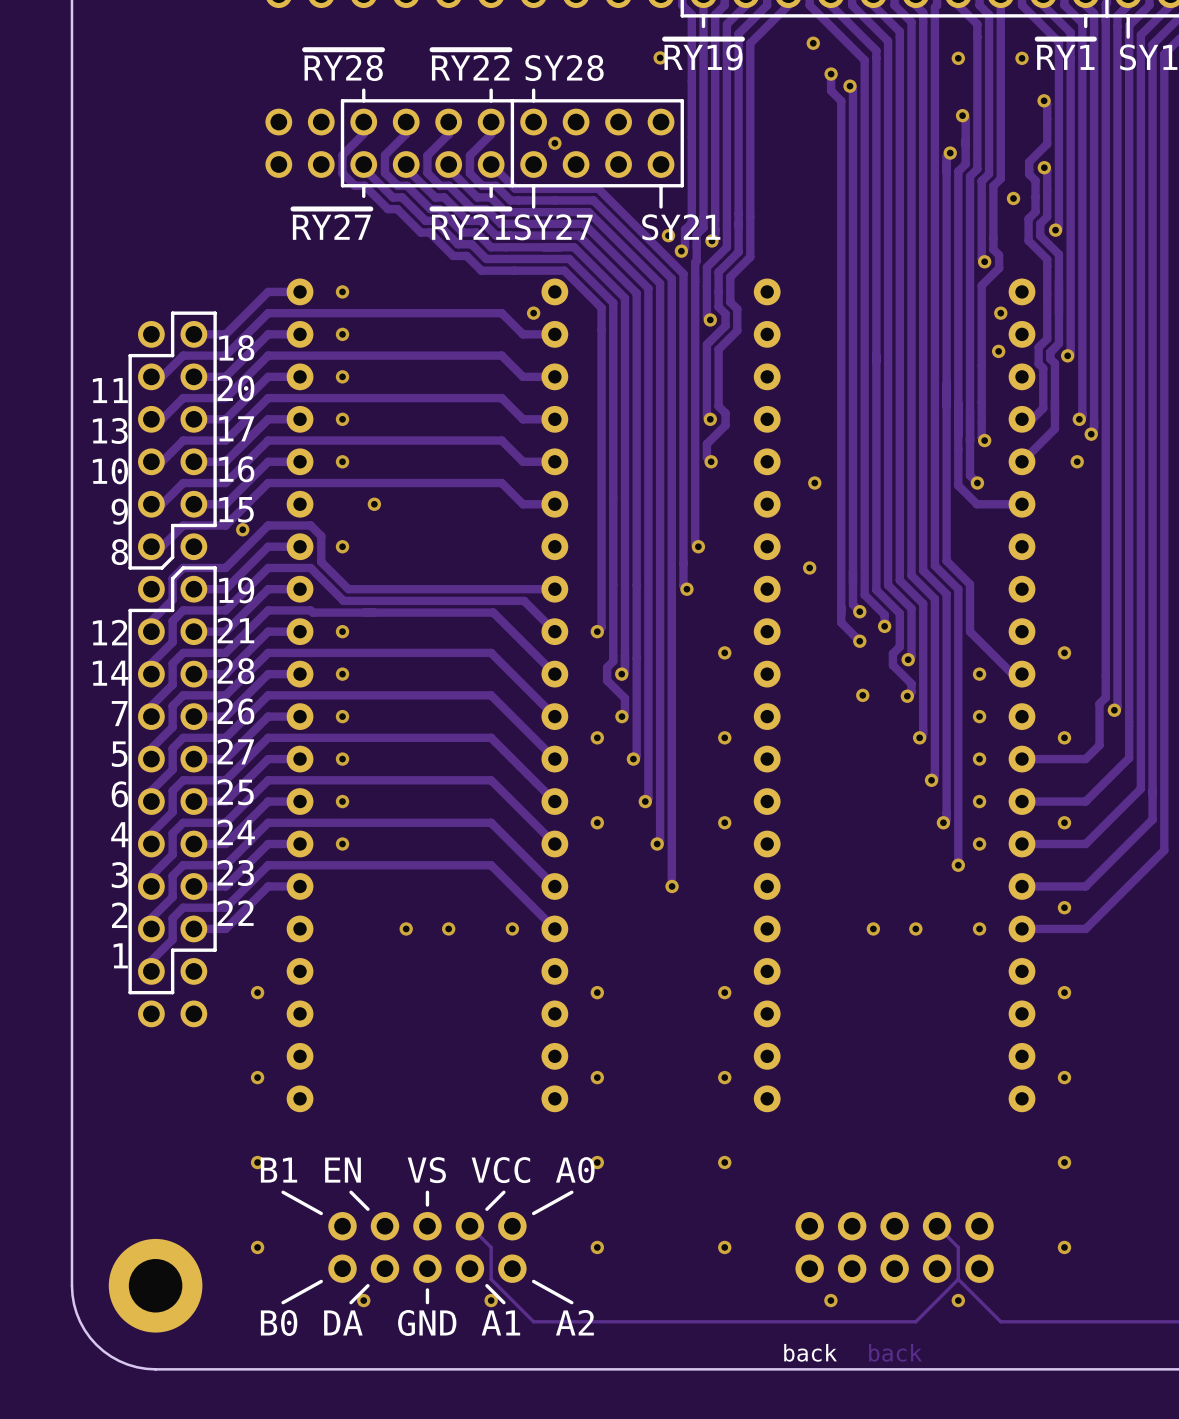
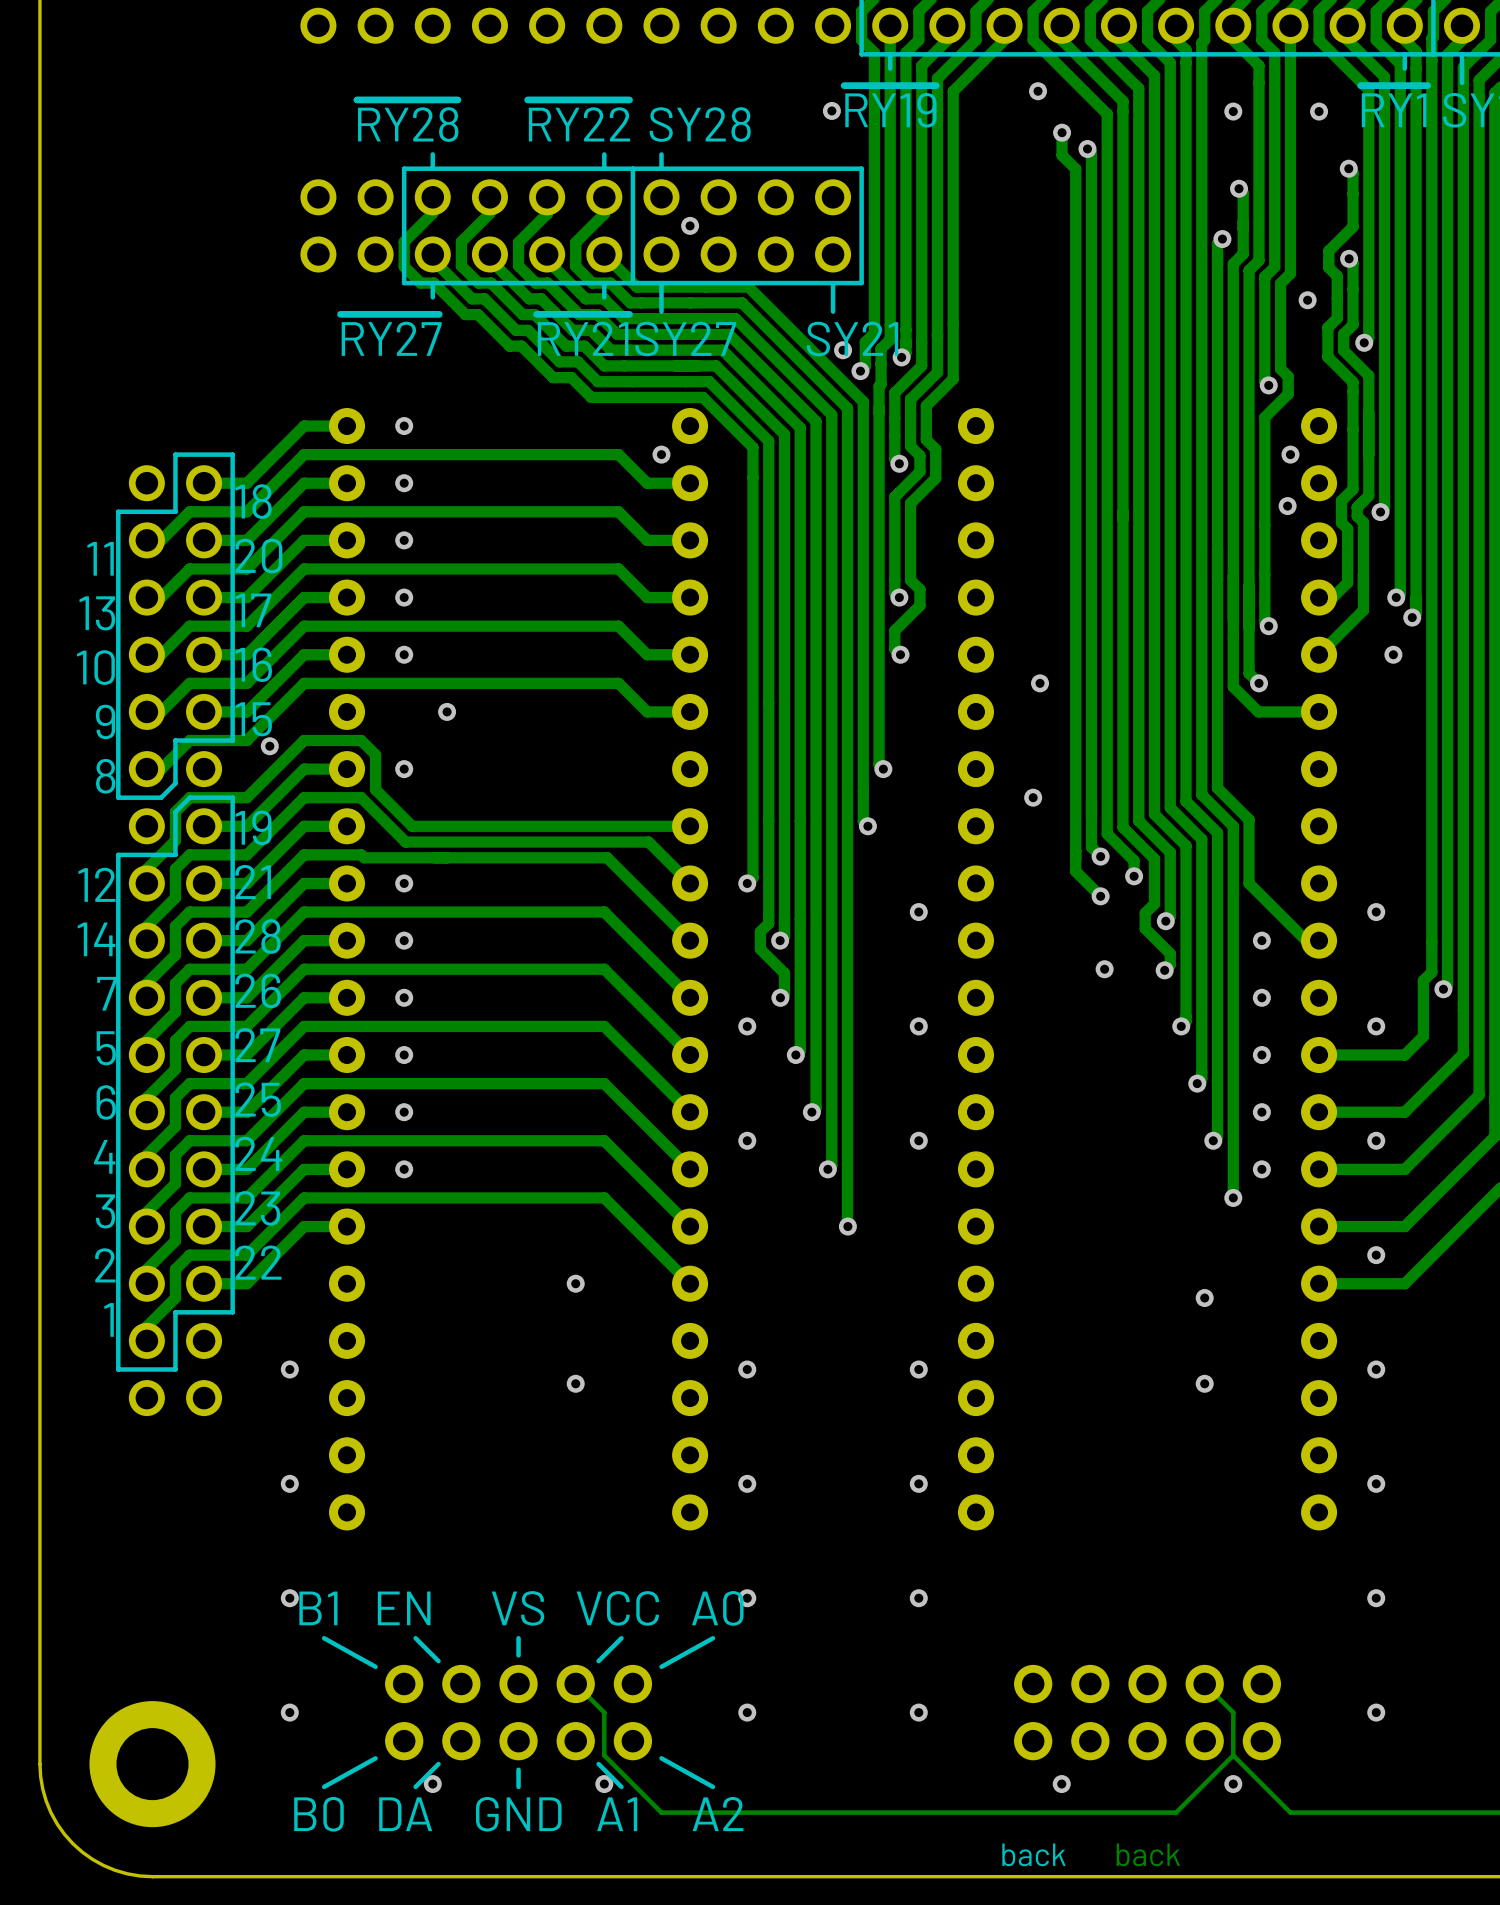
via: (406, 928) -> none
via: (448, 928) -> none
via: none -> (575, 1283)
via: (512, 928) -> none
via: (873, 928) -> none
via: (915, 928) -> none
via: (979, 928) -> none
via: none -> (1204, 1298)
via: none -> (575, 1383)
via: none -> (1204, 1383)

